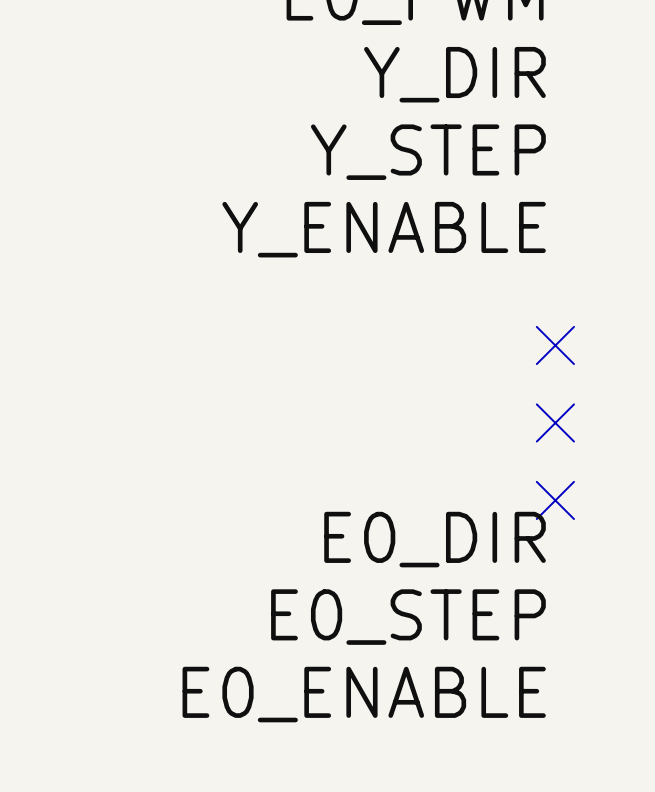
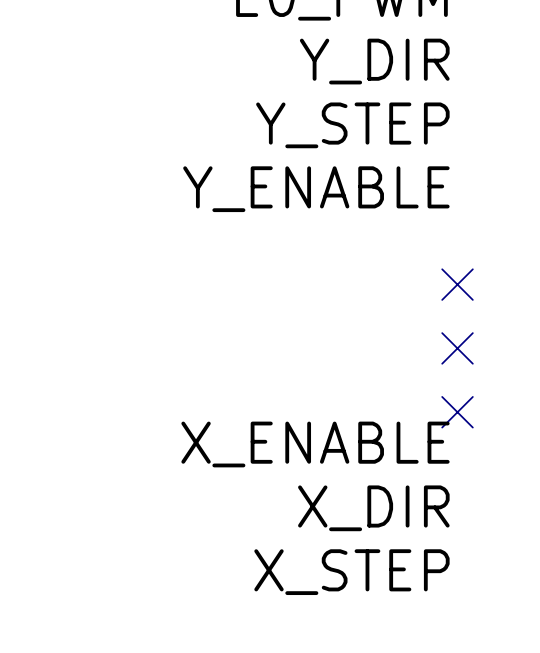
label: E0_DIR (435, 539) -> X_ENABLE (315, 444)
label: E0_STEP (408, 617) -> X_DIR (373, 508)
label: E0_ENABLE (364, 694) -> X_STEP (351, 572)

